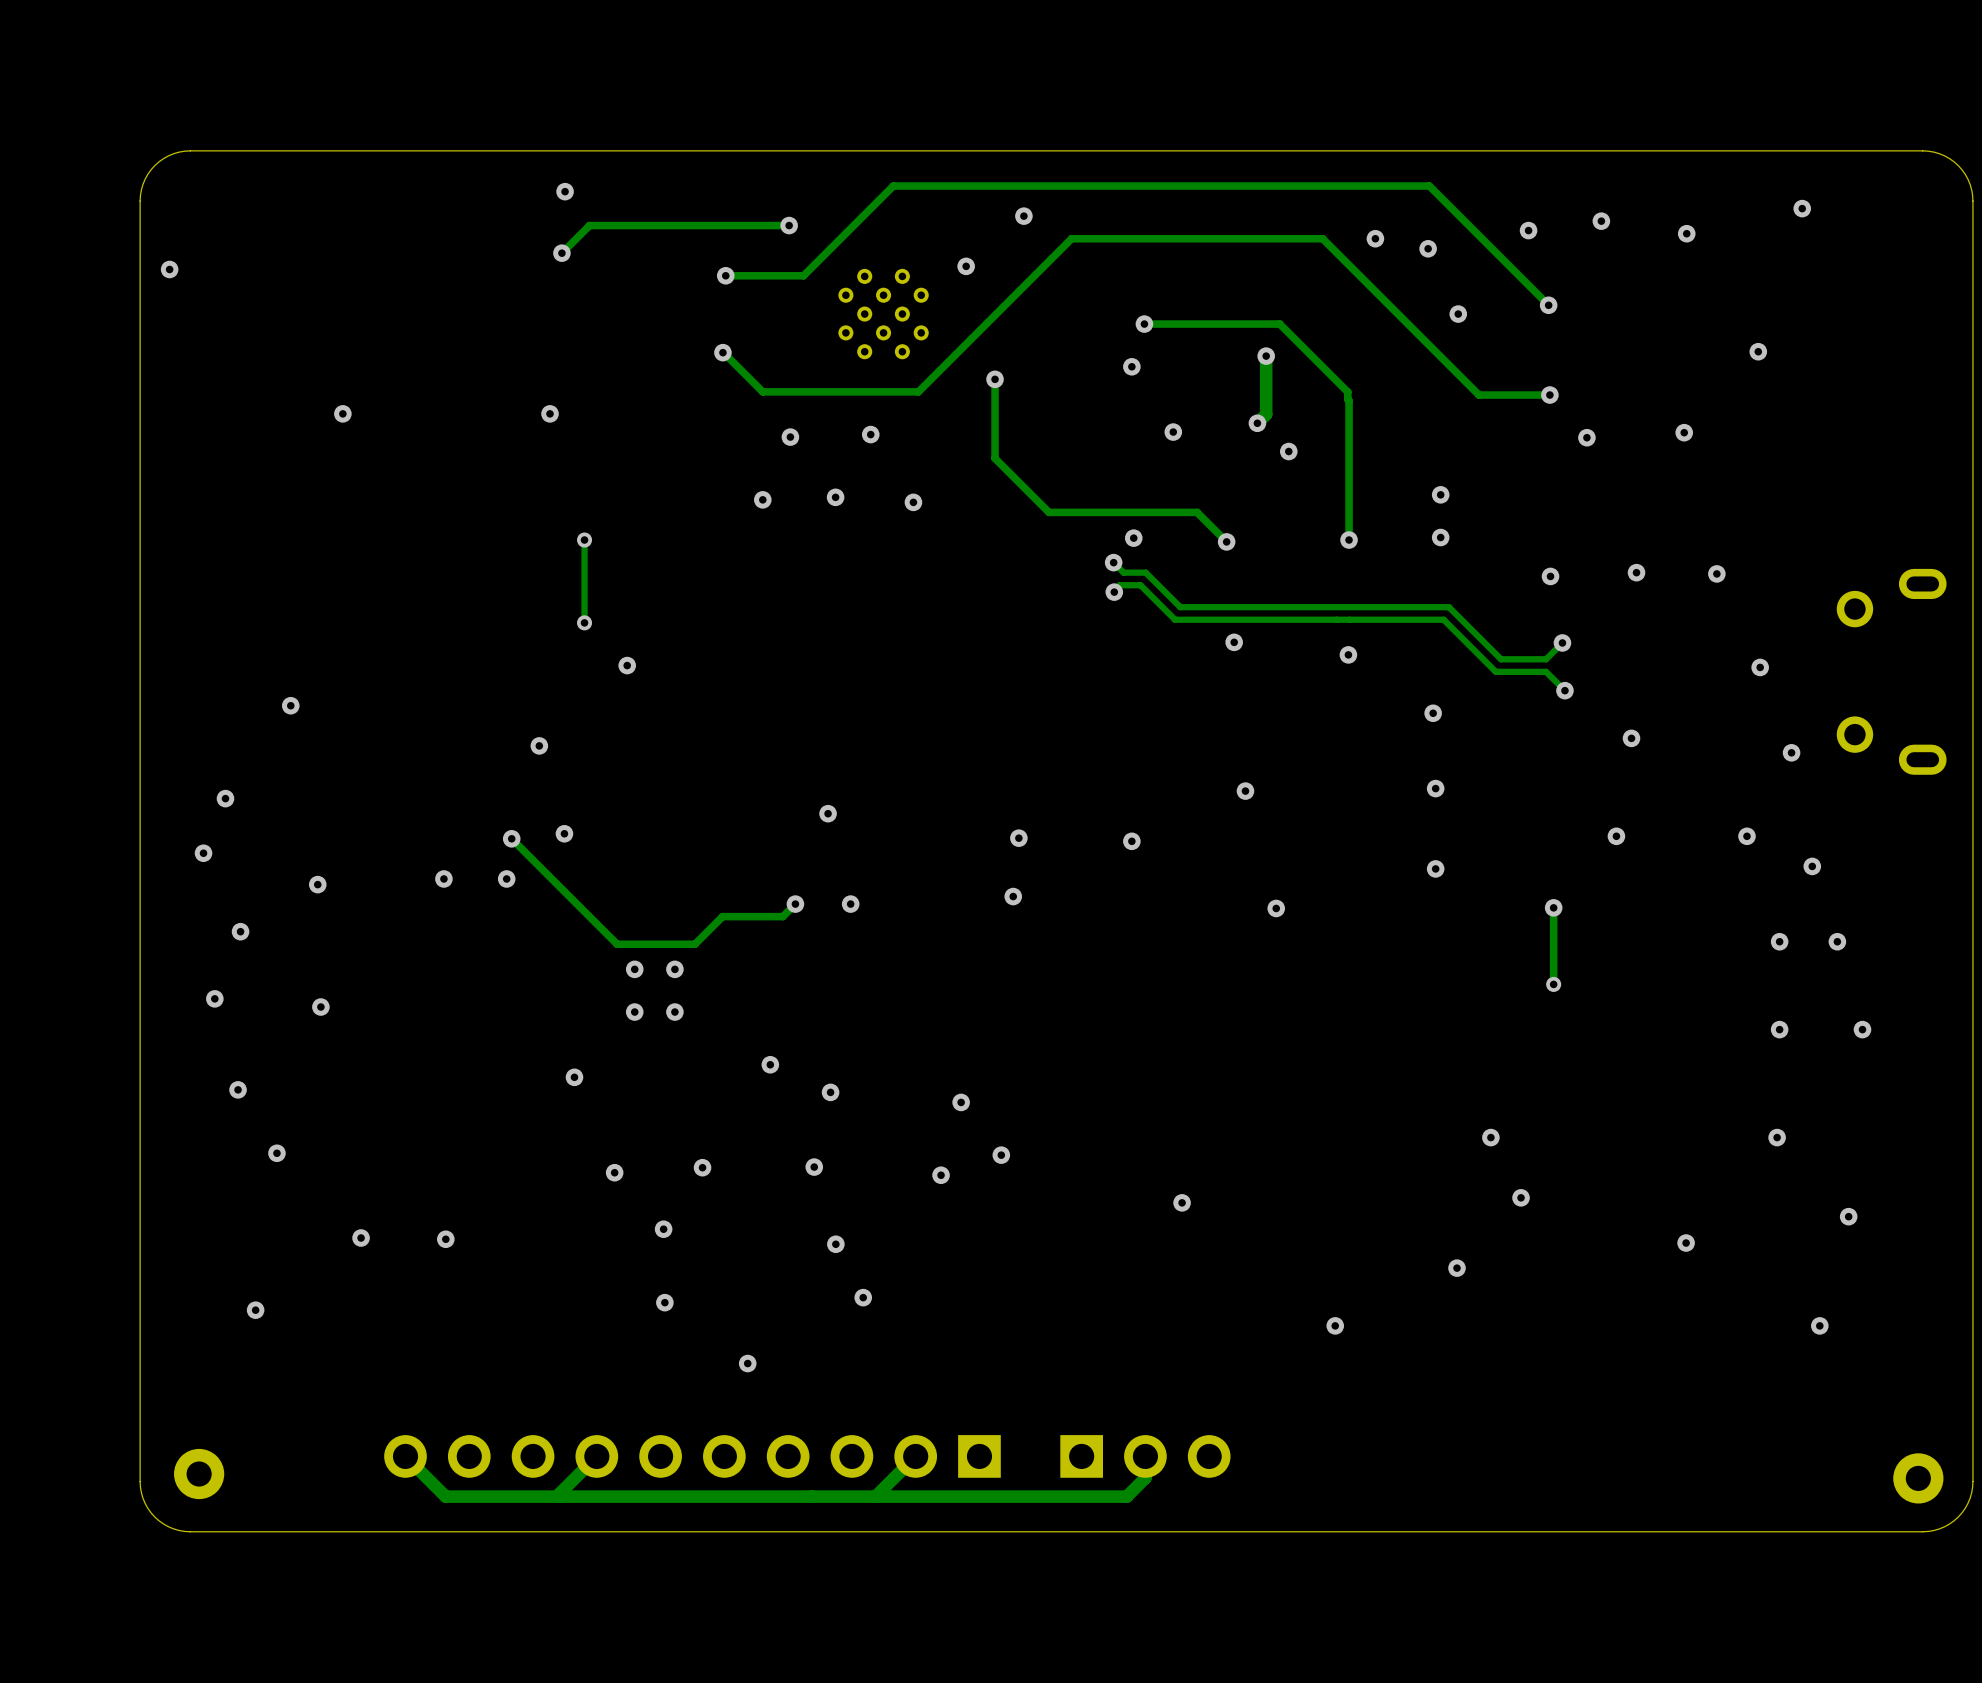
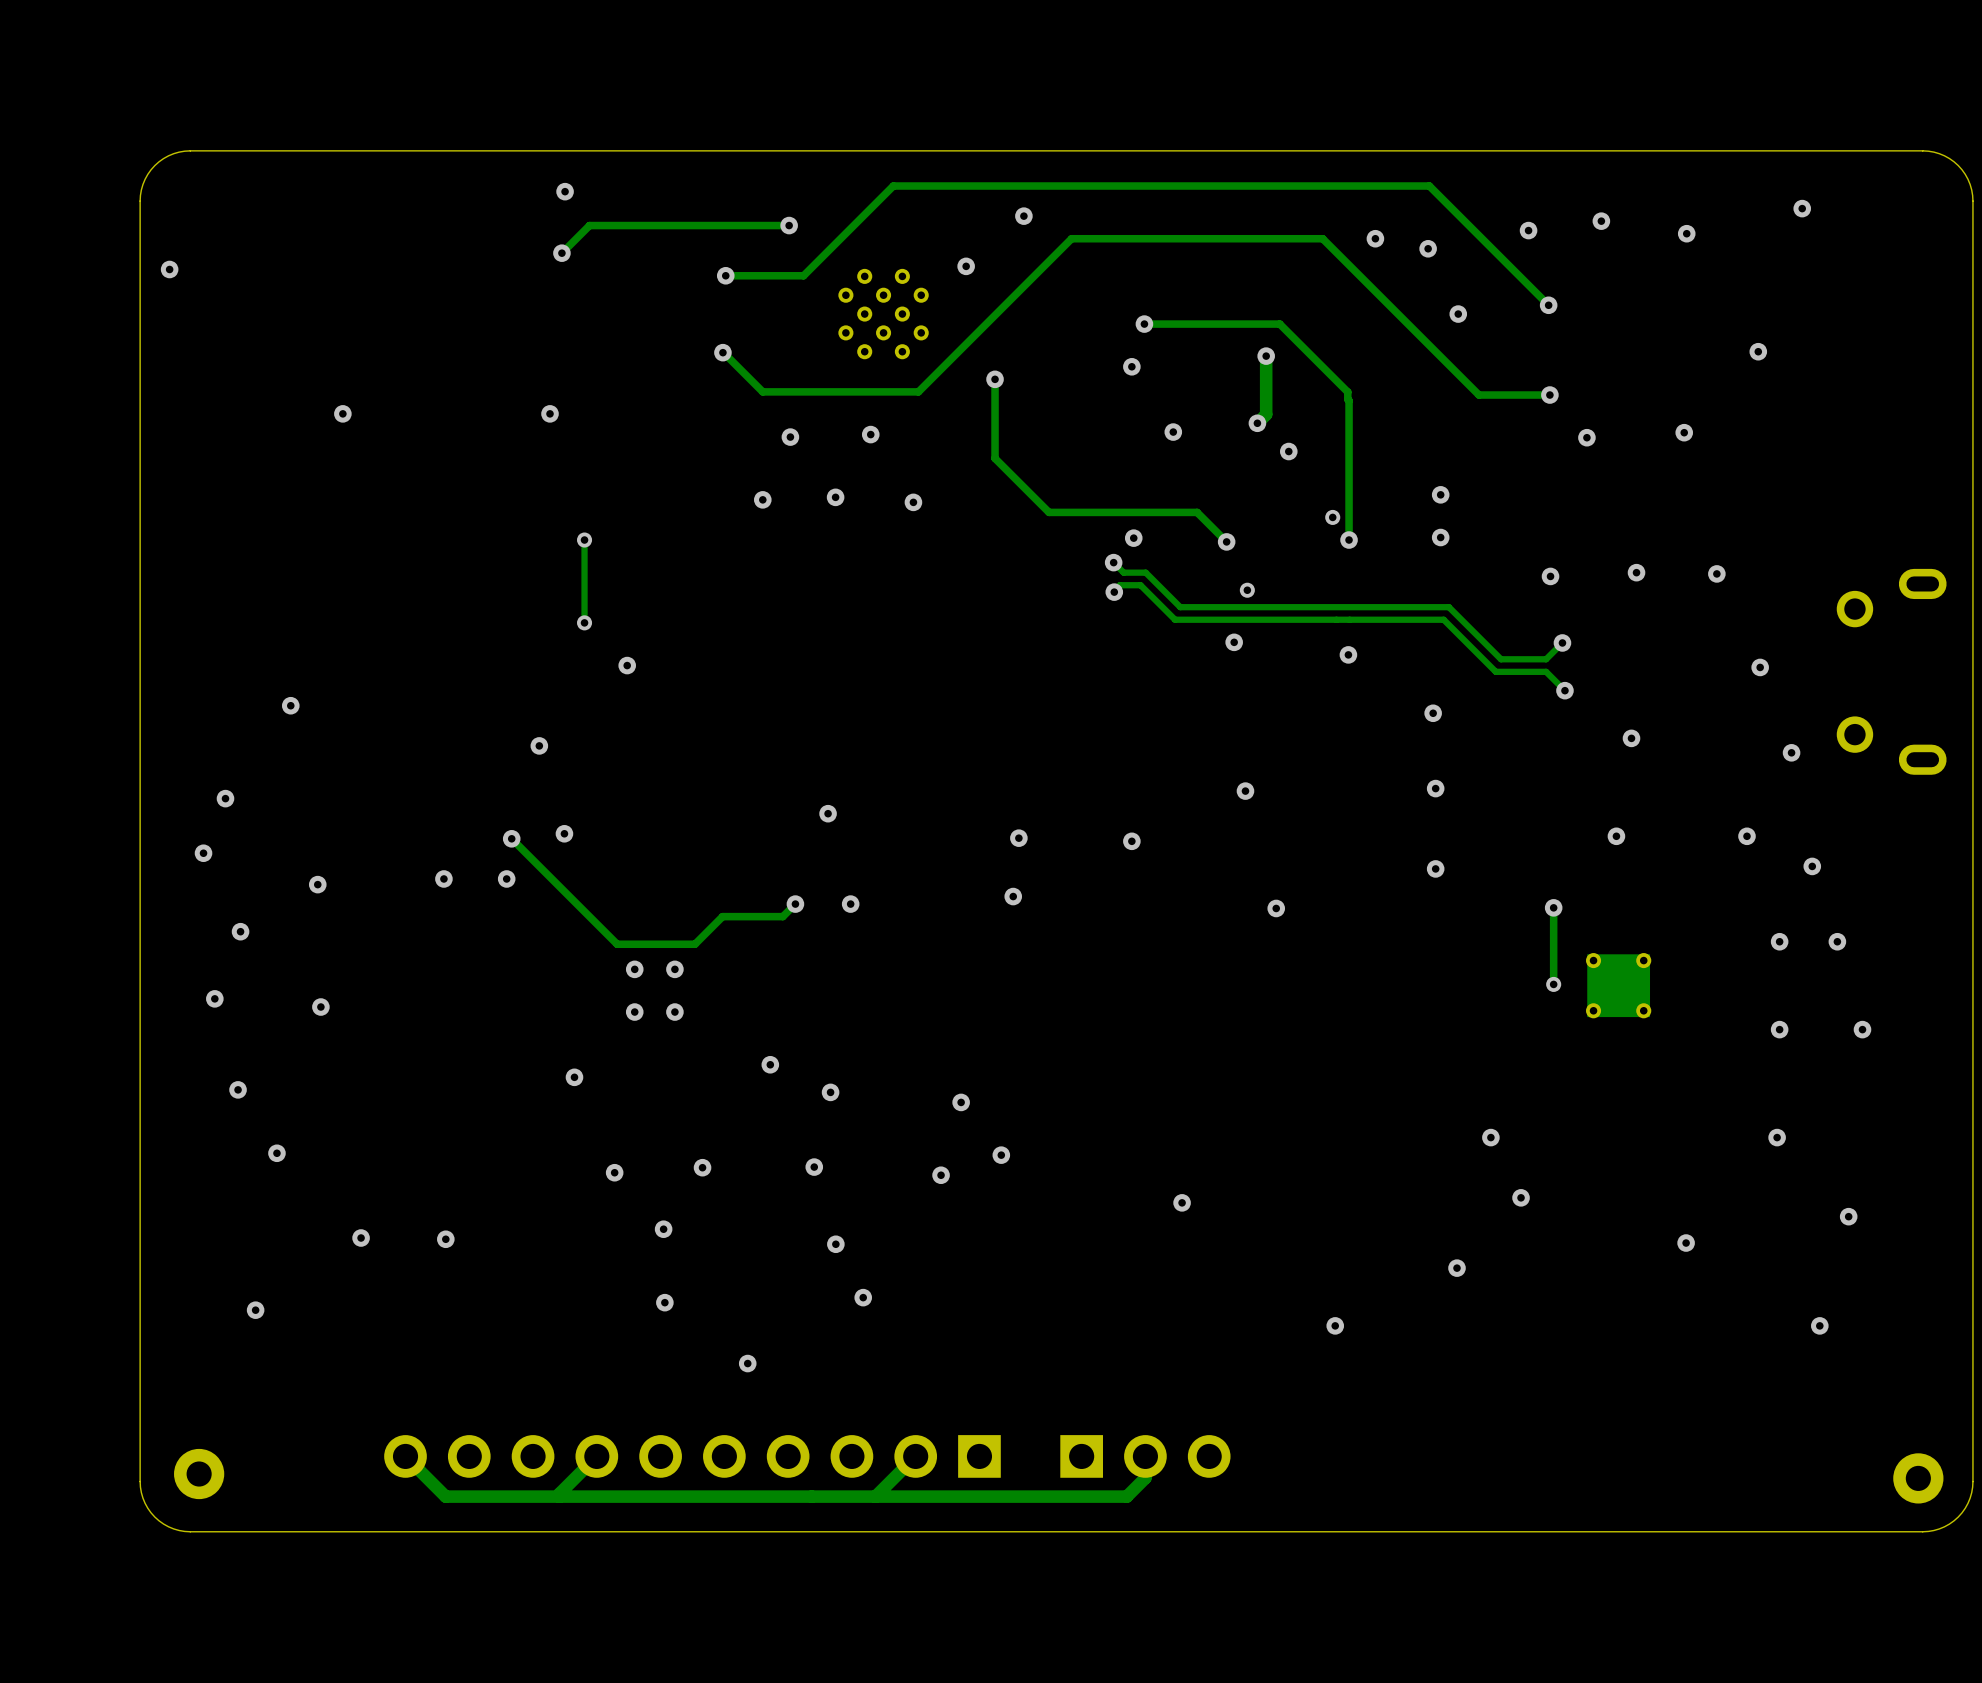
via: none -> (1332, 517)
via: none -> (1247, 590)
part: none -> (1618, 985)

